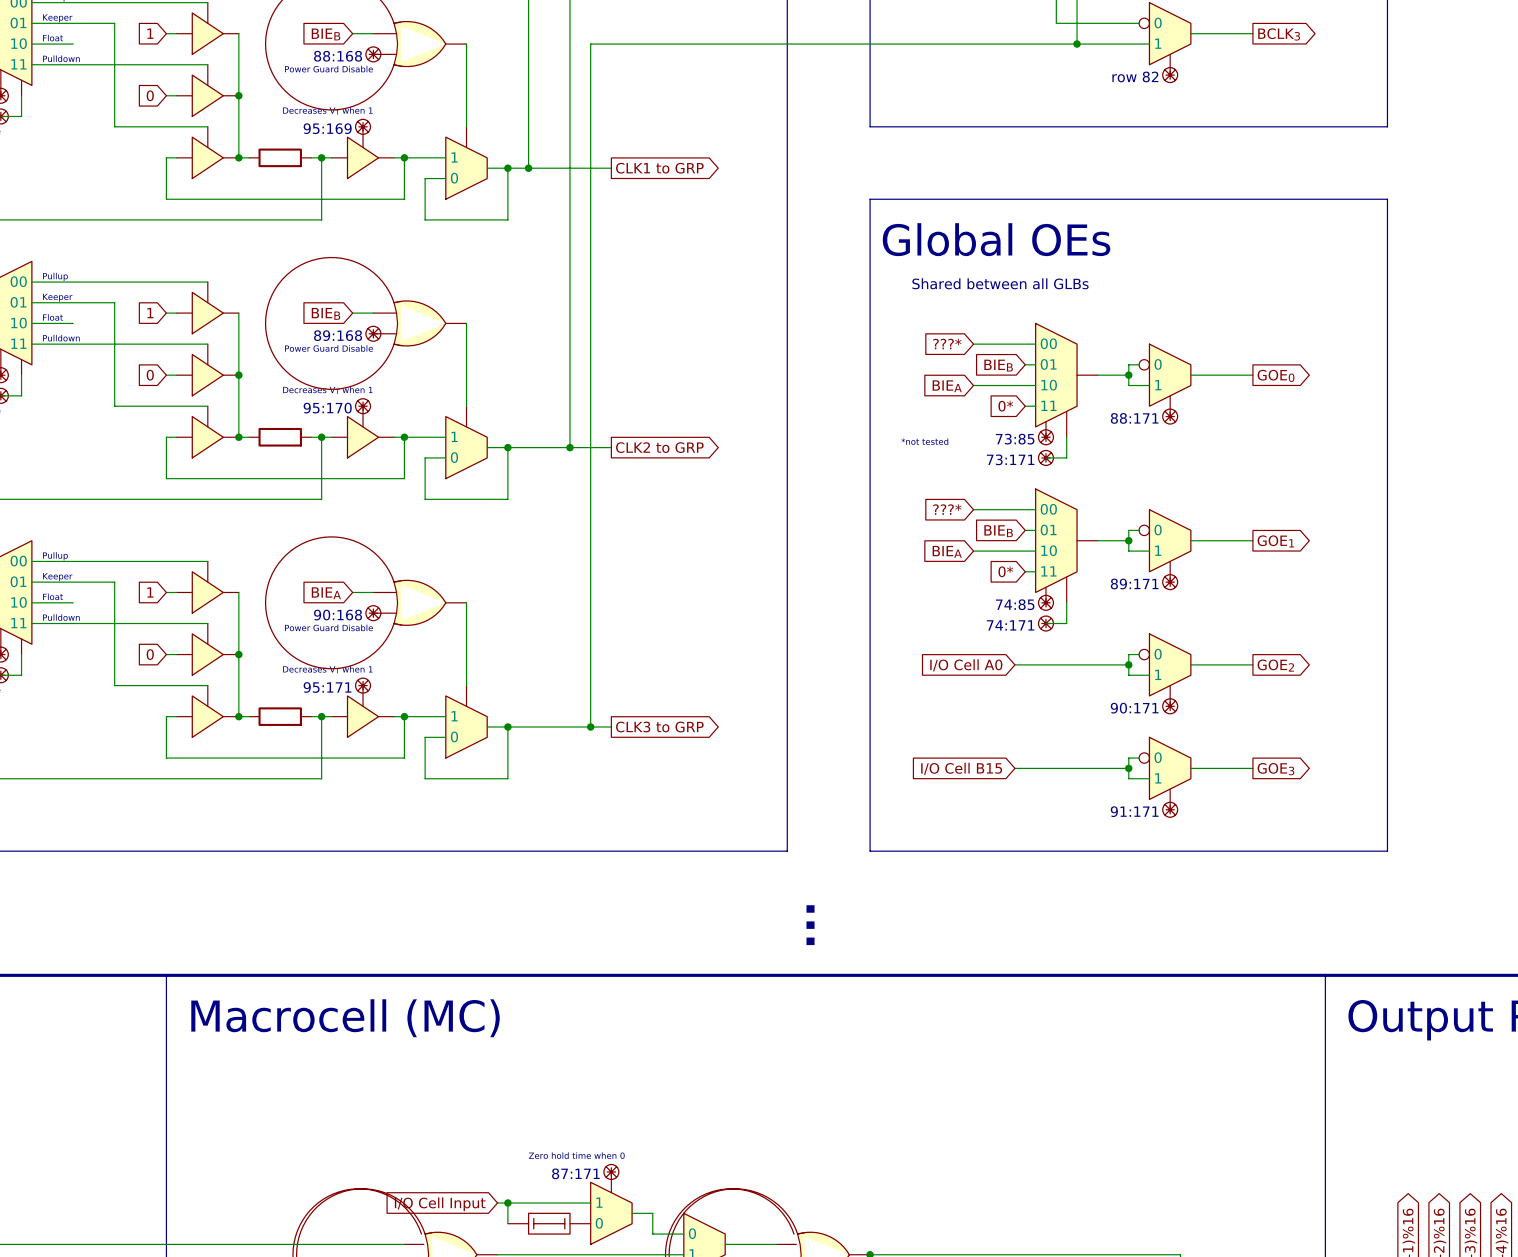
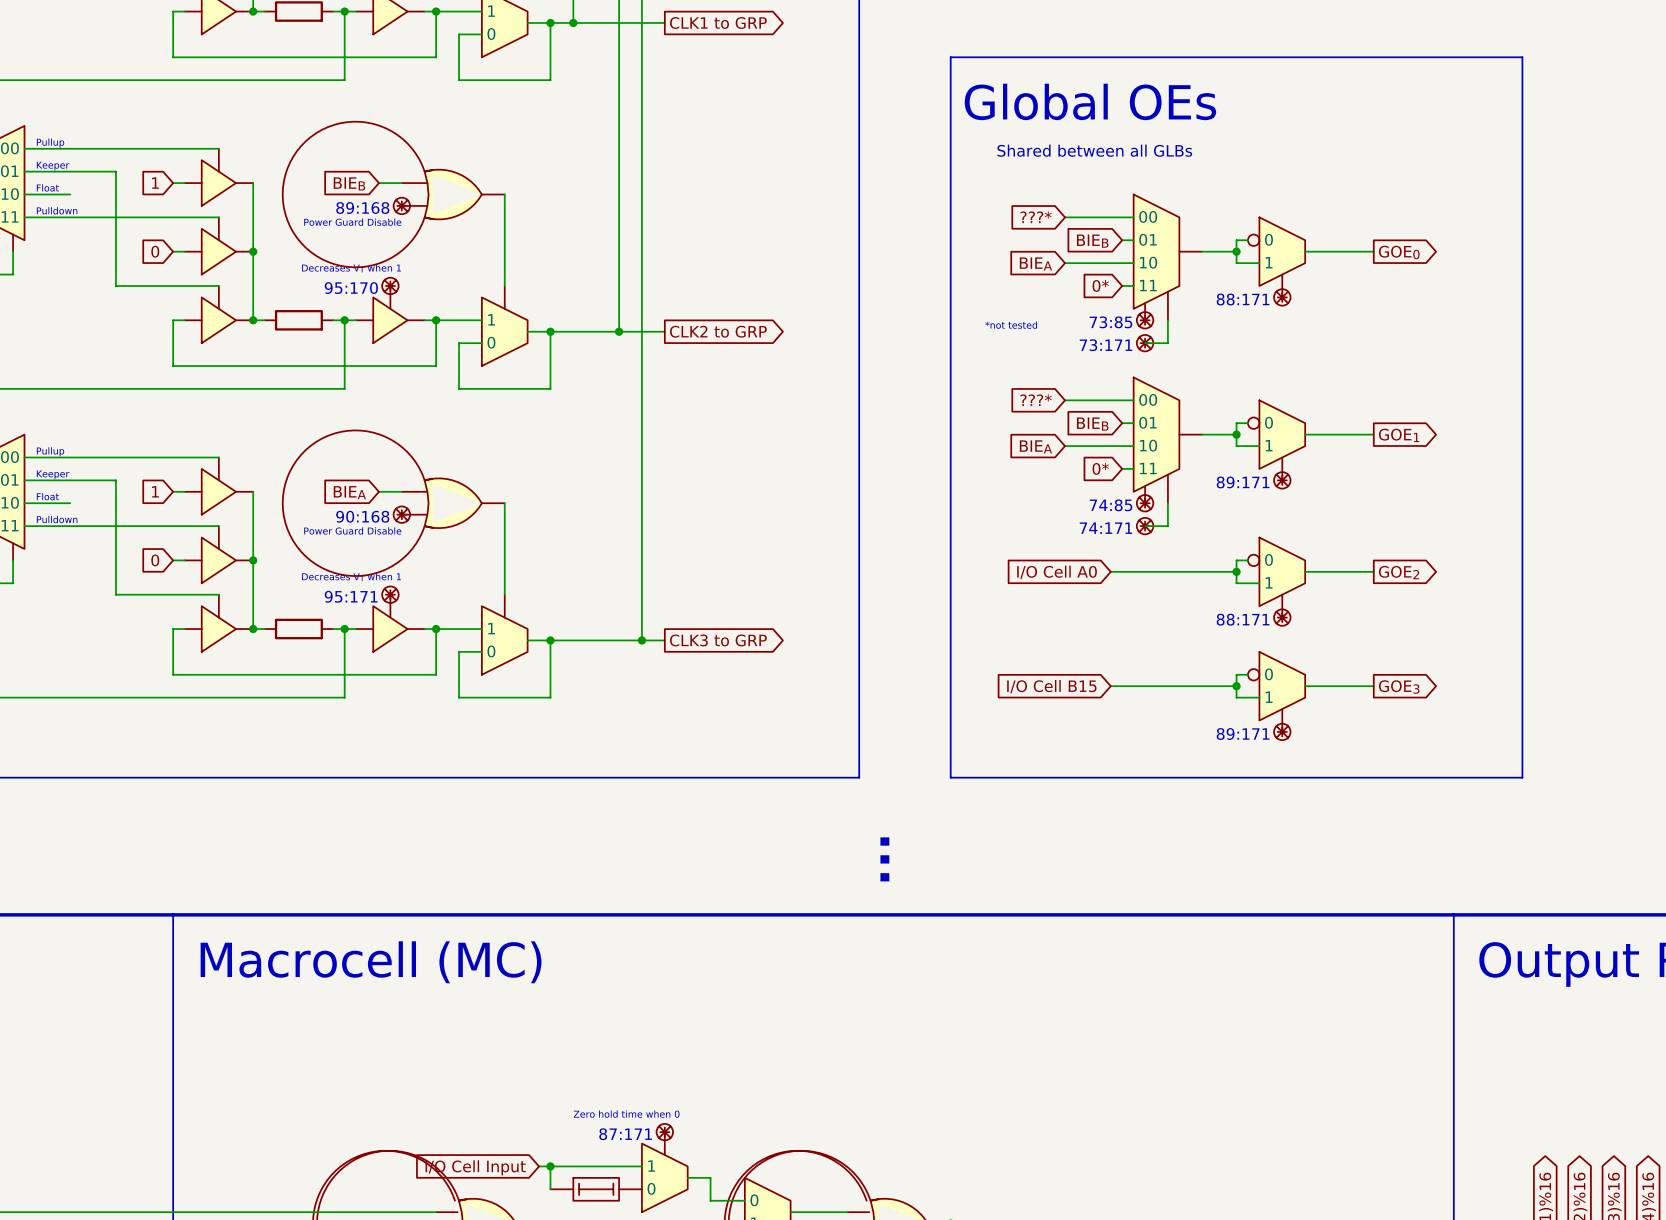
text: 90:171 (1134, 708) -> 88:171 (1243, 619)
text: 91:171 (1134, 811) -> 89:171 (1243, 734)

